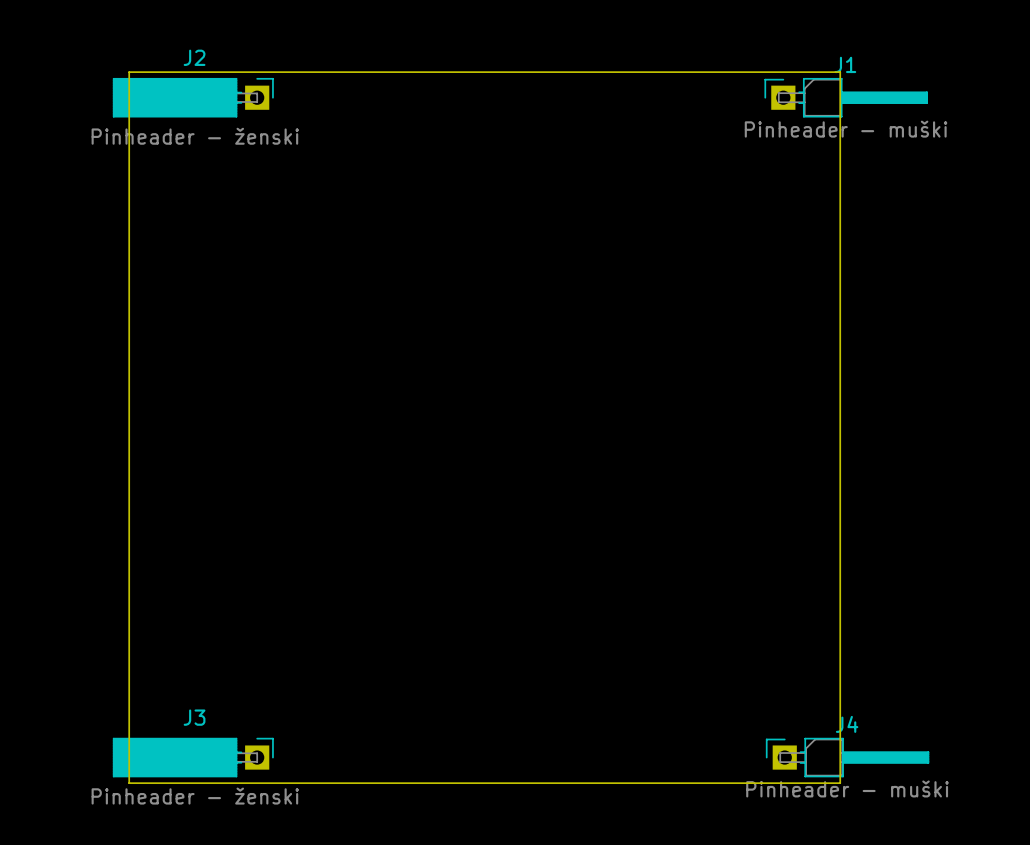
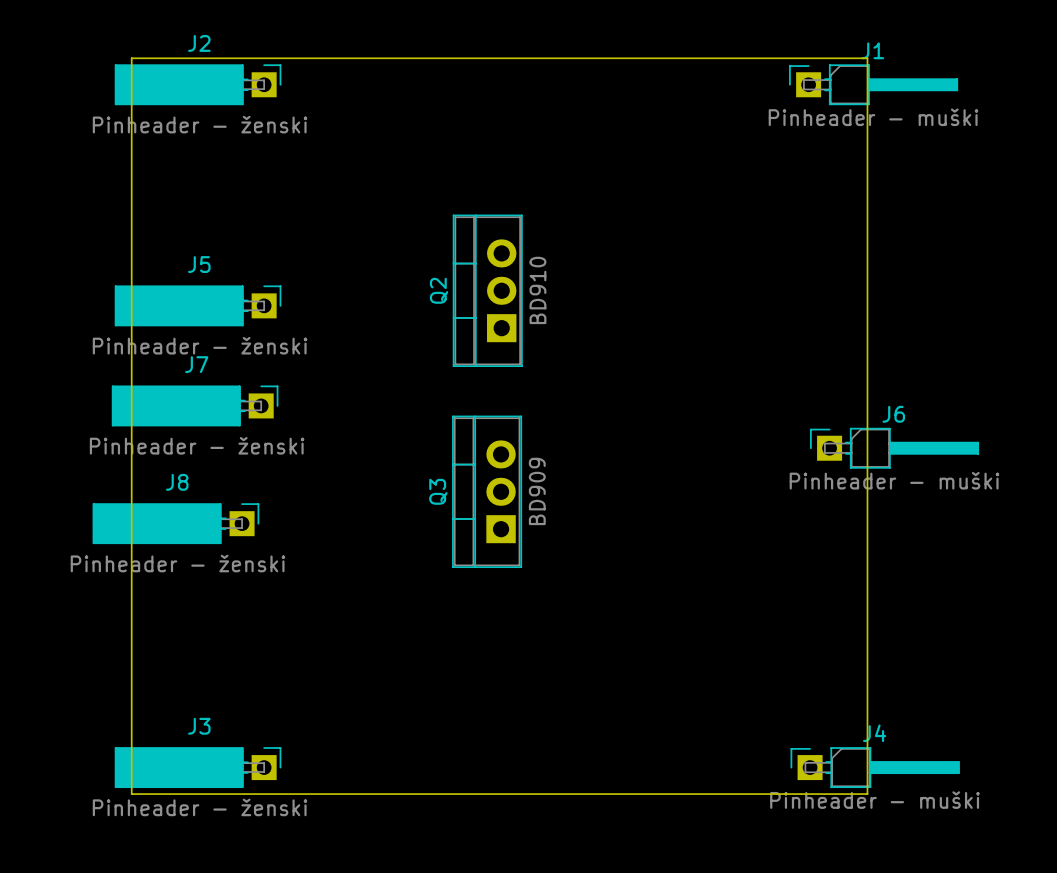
Q2: none -> BD910 (487, 290)
J5: none -> Pinheader - ženski (198, 305)
J7: none -> Pinheader - ženski (195, 405)
J6: none -> Pinheader - muški (894, 448)
Q3: none -> BD909 (487, 491)
J8: none -> Pinheader - ženski (175, 523)

